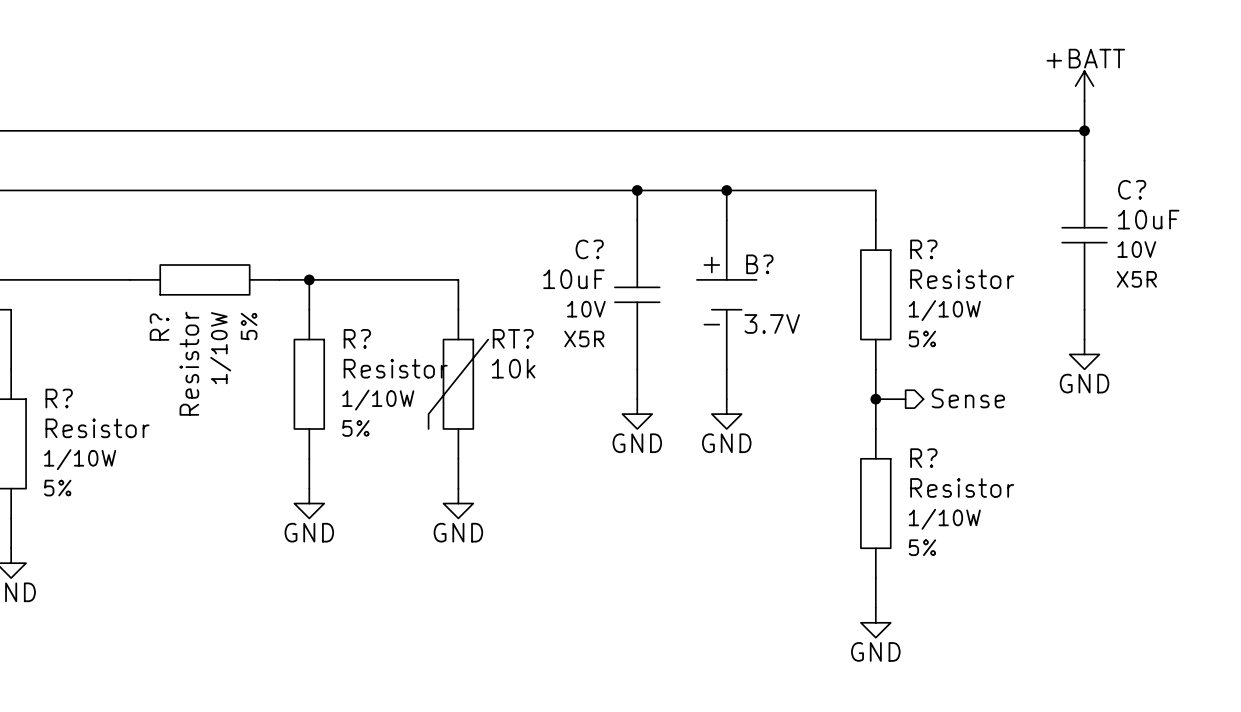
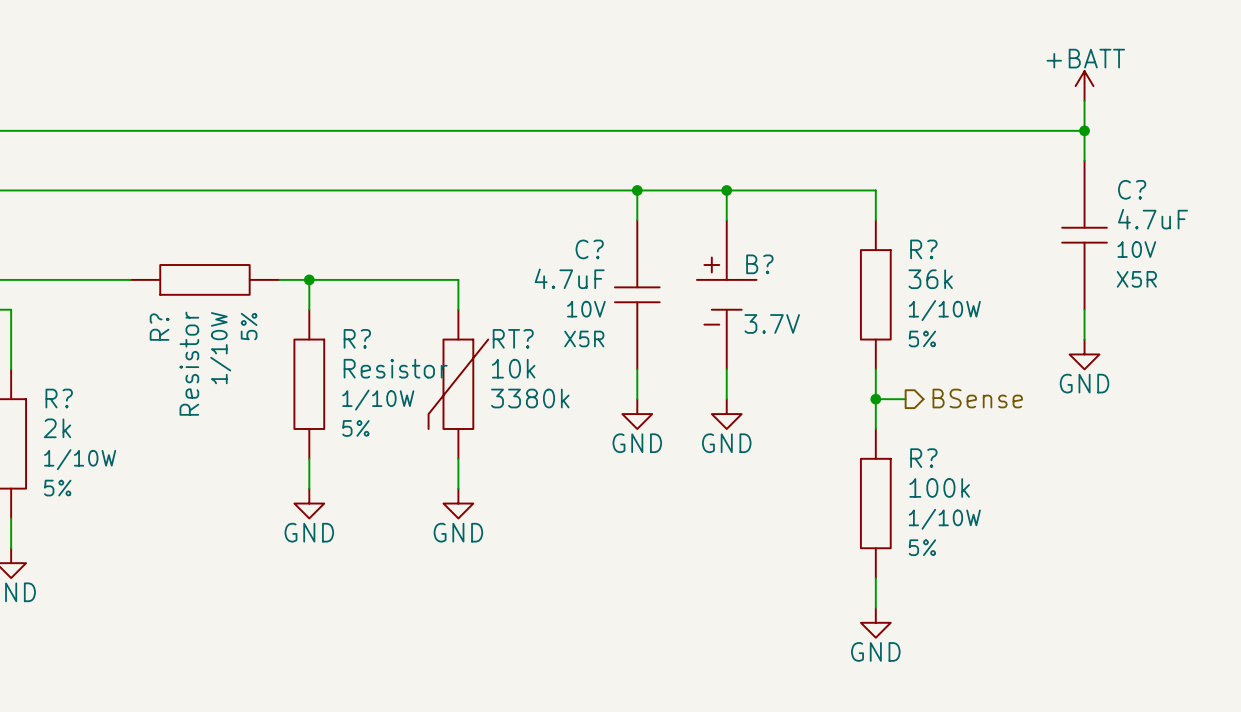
C? value: 10uF (1148, 219) -> 4.7uF (1153, 219)
C? value: 10uF (573, 279) -> 4.7uF (569, 278)
R? value: Resistor (962, 279) -> 36k (930, 279)
RT? text: none -> 3380k (530, 398)
hierarchical label: Sense (968, 398) -> BSense (977, 398)
R? value: Resistor (97, 428) -> 2k (57, 428)
R? value: Resistor (962, 487) -> 100k (939, 487)

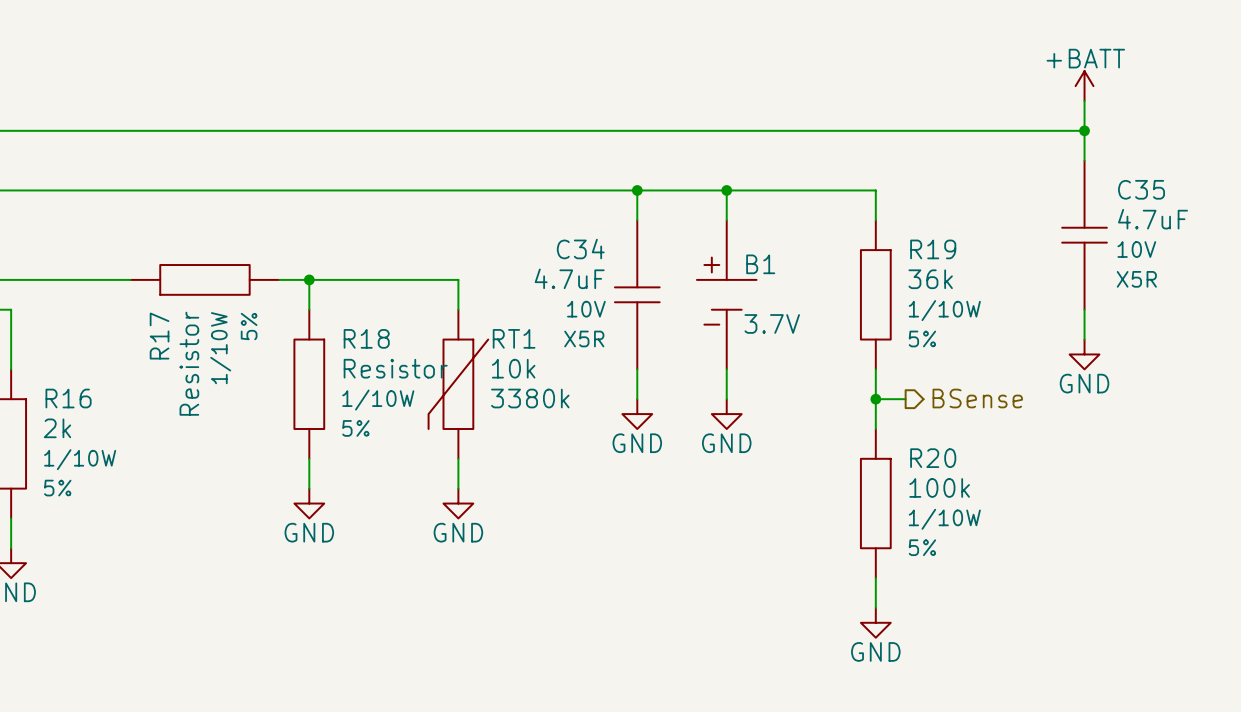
C? name: C? (1132, 189) -> C35 (1141, 189)
C? name: C? (589, 249) -> C34 (580, 249)
R? name: R? (923, 249) -> R19 (933, 249)
B? name: B? (759, 264) -> B1 (760, 264)
R? name: R? (159, 327) -> R17 (159, 336)
R? name: R? (357, 338) -> R18 (366, 338)
RT? name: RT? (513, 338) -> RT1 (514, 338)
R? name: R? (59, 398) -> R16 (68, 398)
R? name: R? (923, 458) -> R20 (933, 458)

